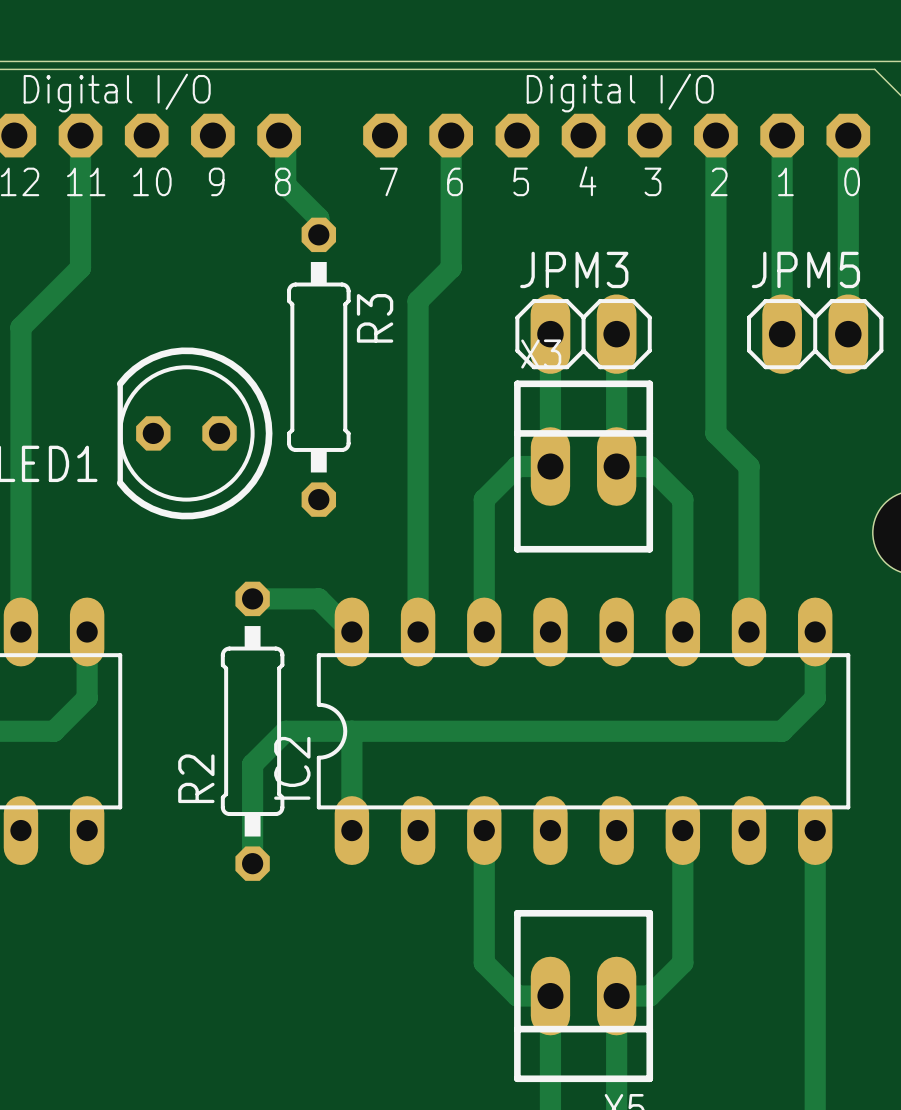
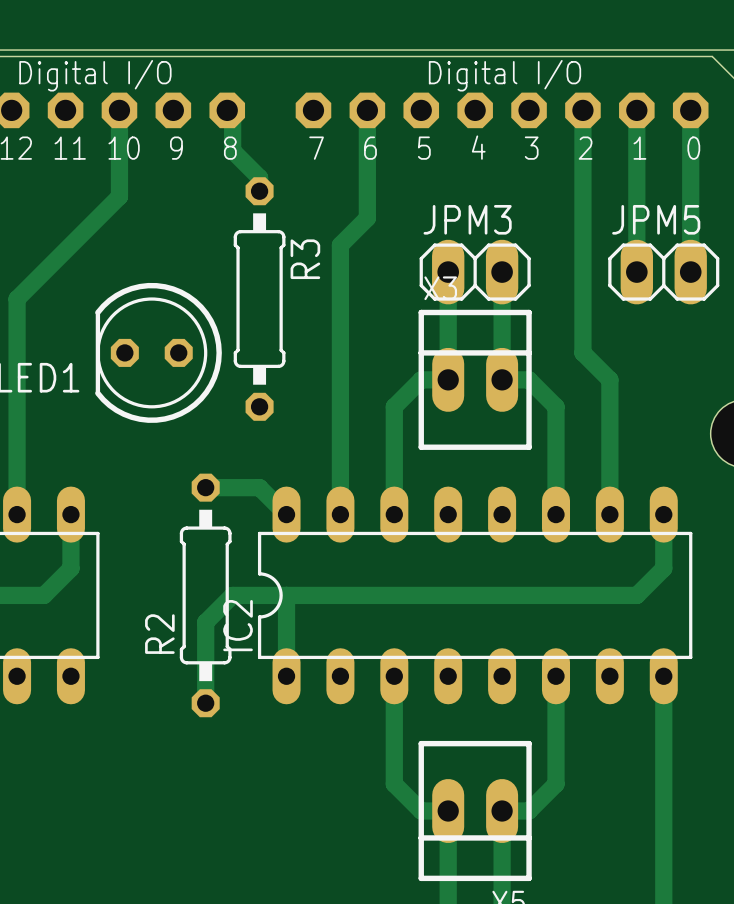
track: (80, 135) (80, 267) (20, 327) (20, 367) -> (119, 110) (119, 196) (17, 299)

